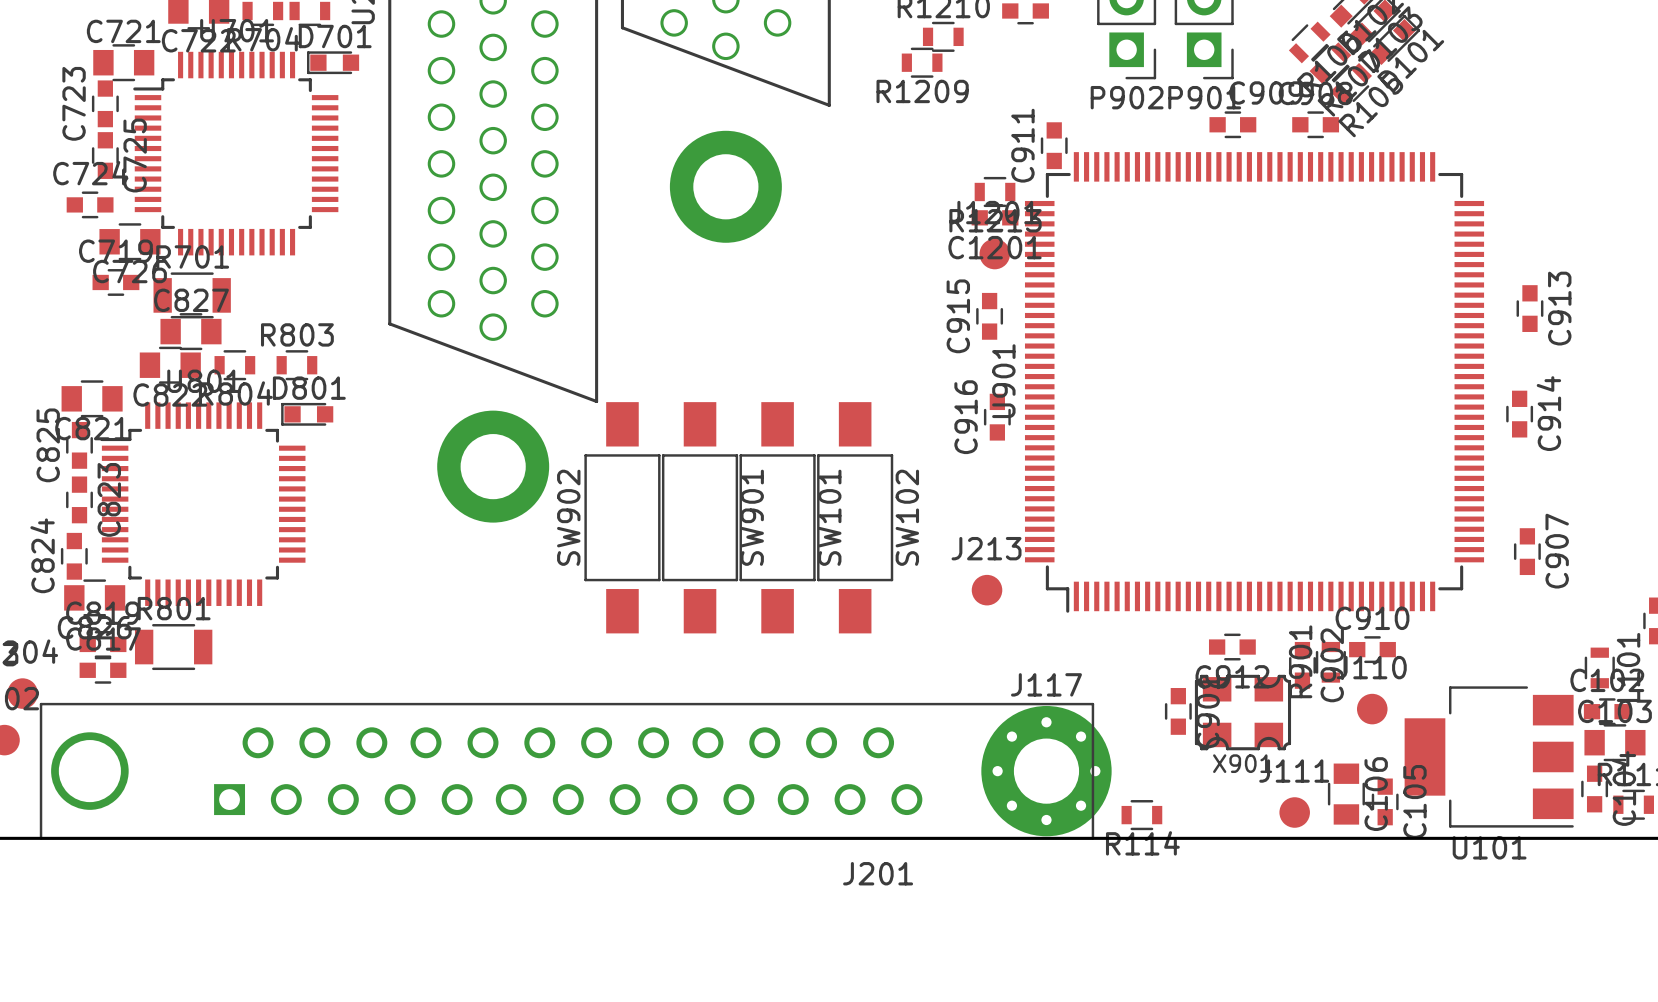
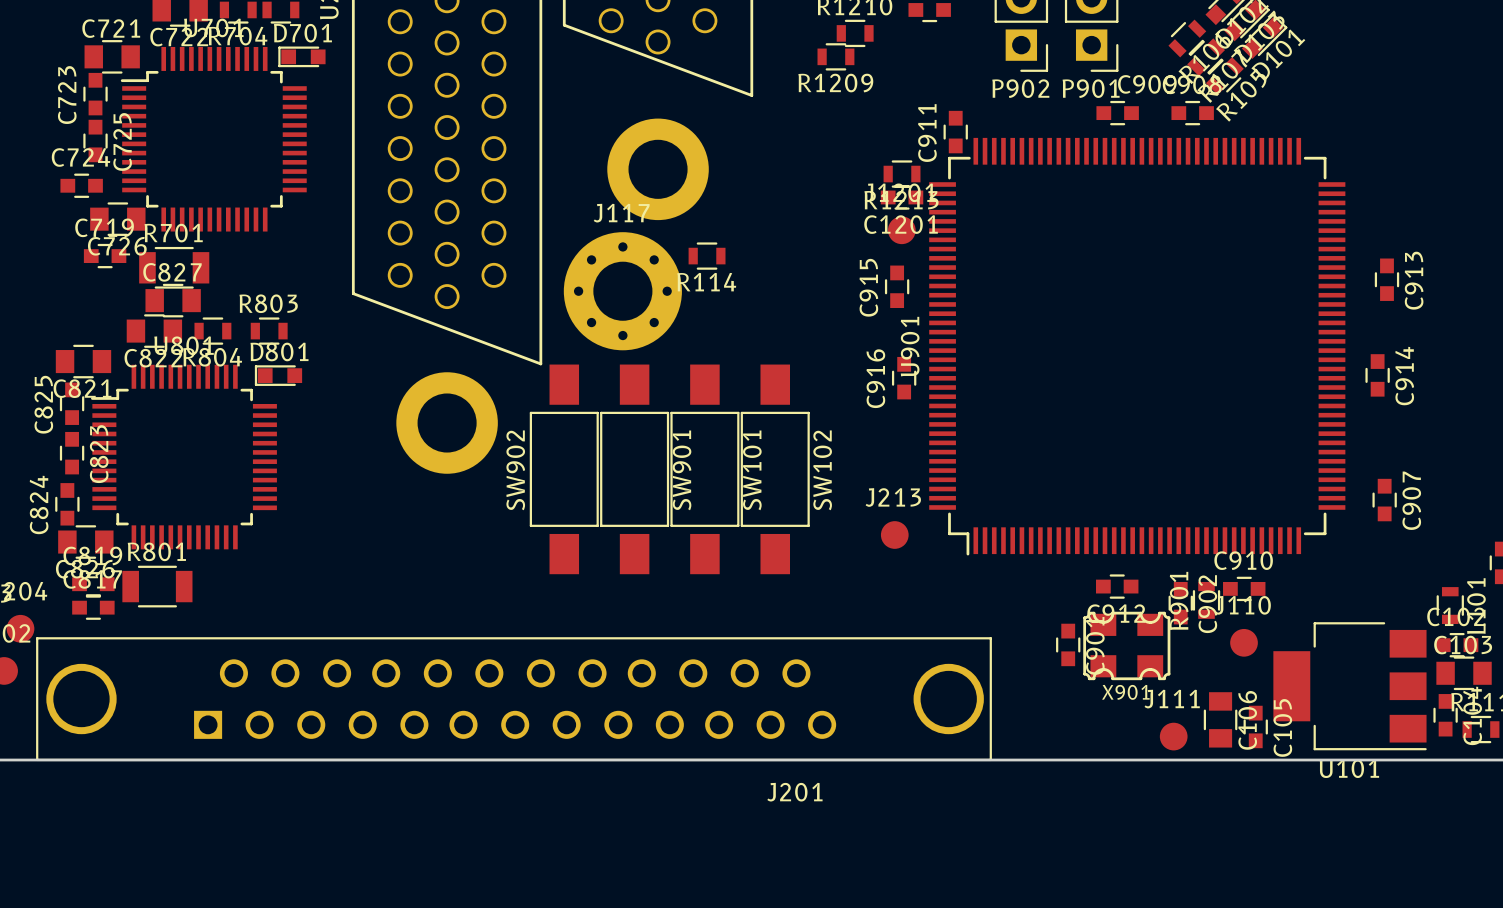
J117 position: (1046, 771) -> (622, 291)
R114 position: (1141, 815) -> (707, 256)

